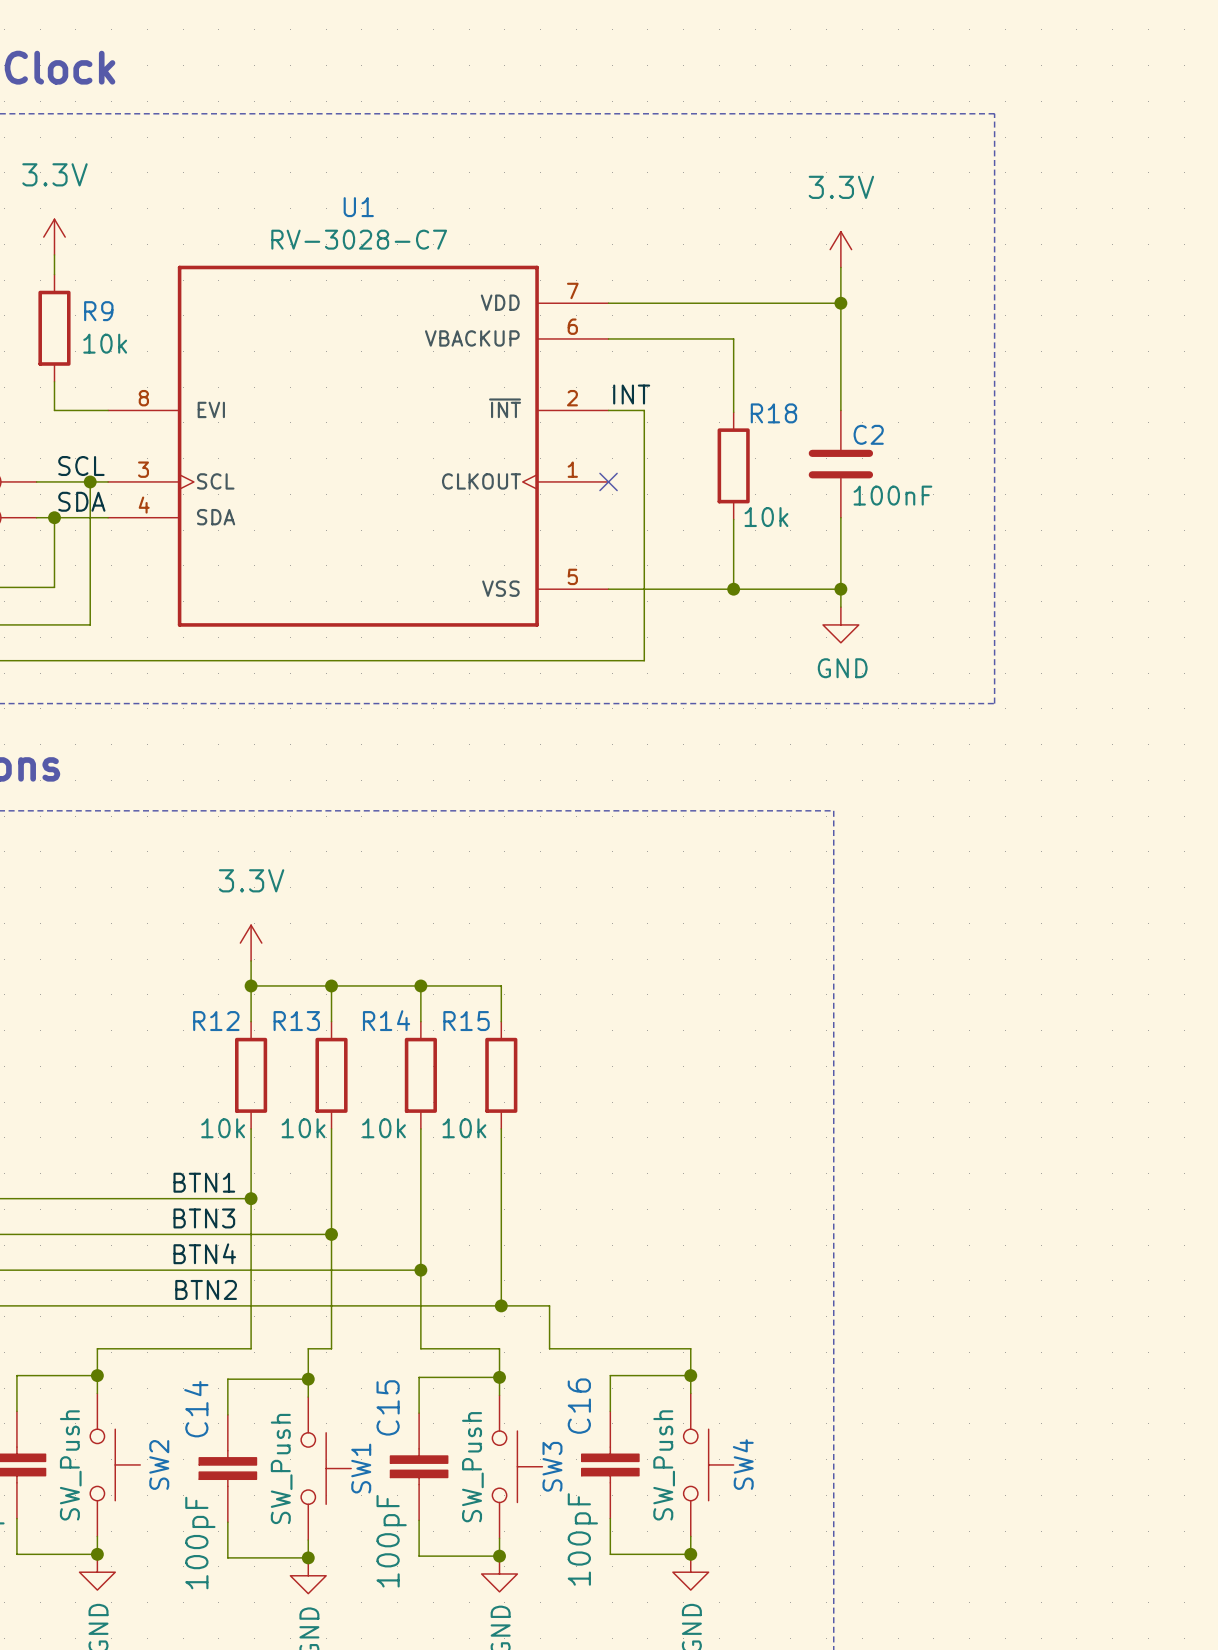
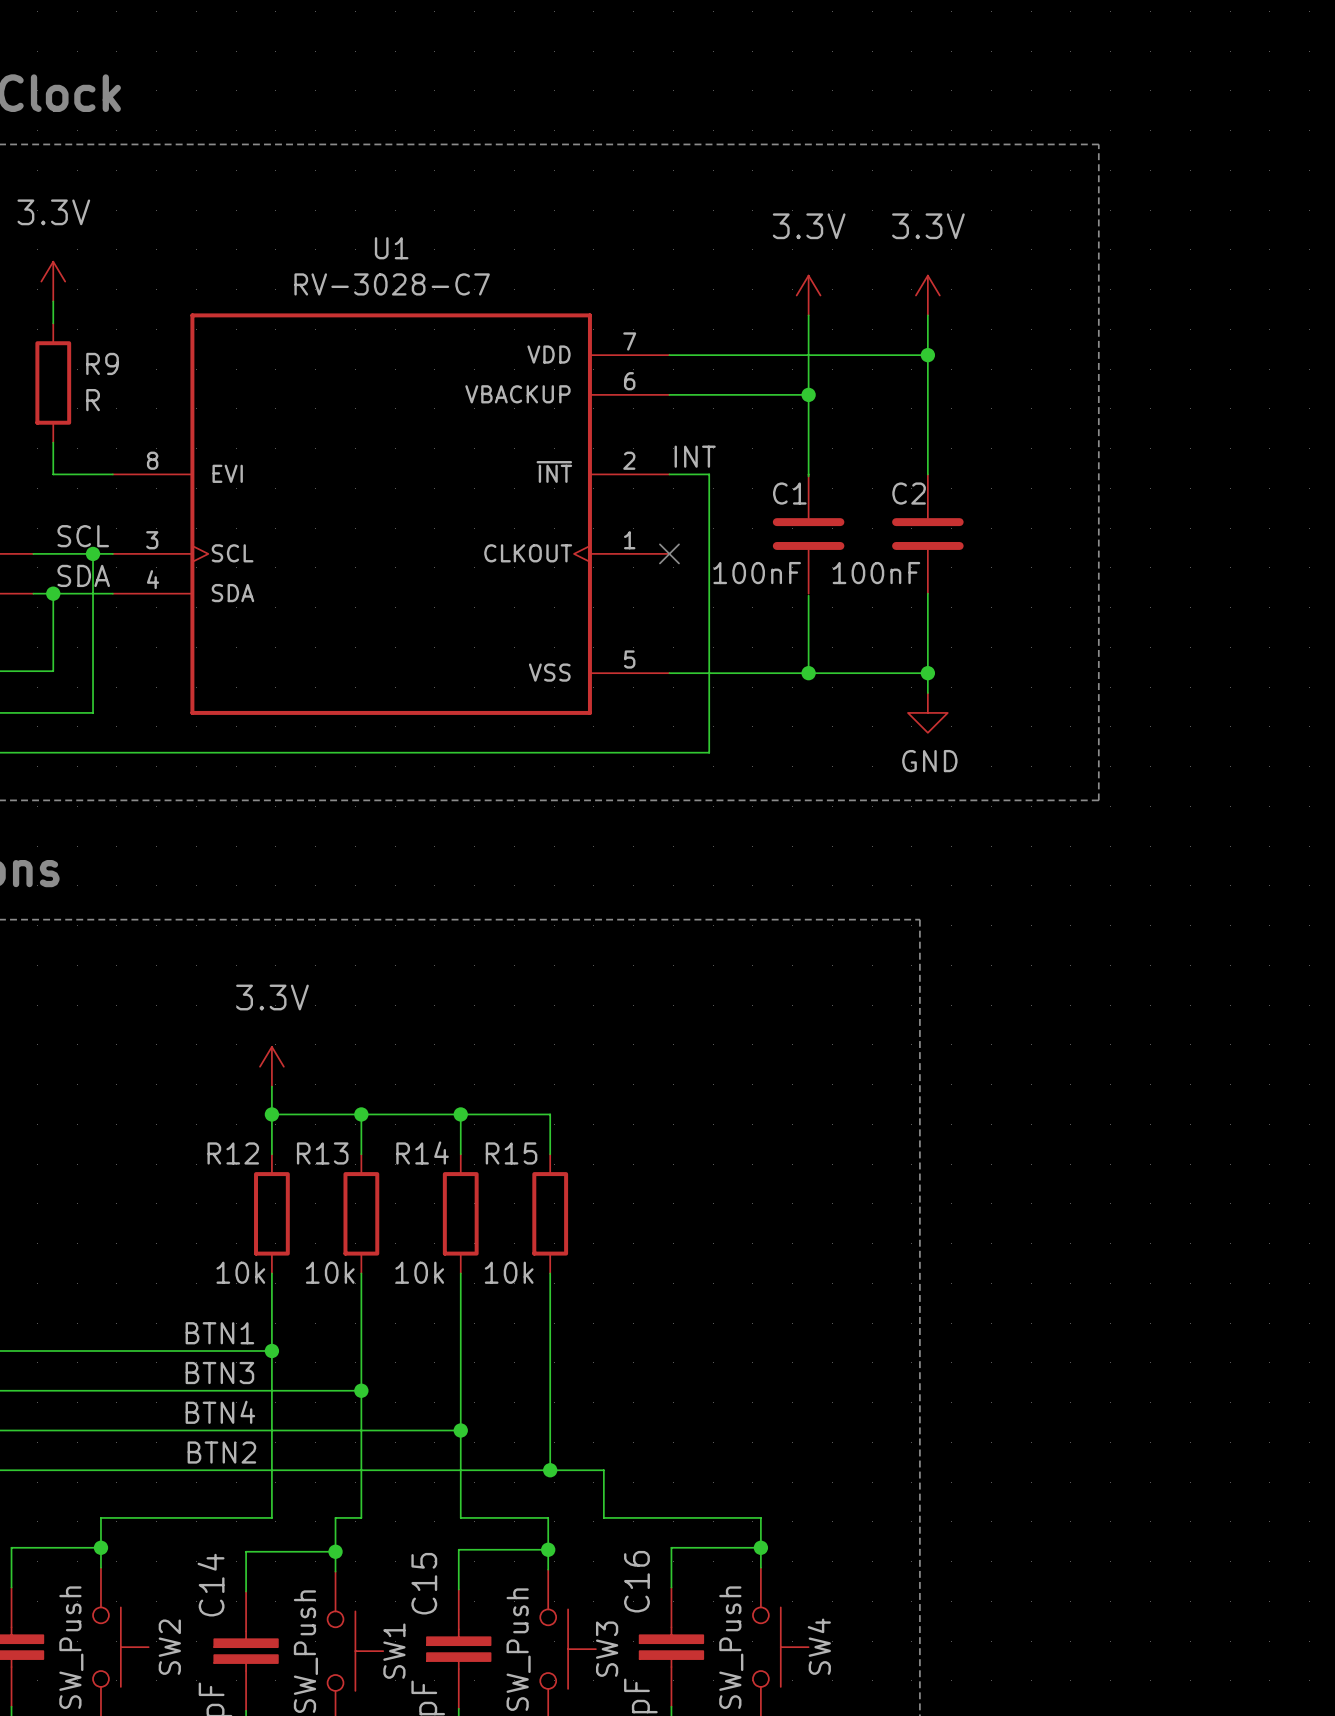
power symbol: none -> 3.3V (808, 295)
wire: none -> (808, 315) (808, 394)
junction: none -> (808, 394)
R9 value: 10k (105, 343) -> R (93, 400)
C2 name position: C2 (868, 434) -> C2 (909, 493)
C1: none -> 100nF (808, 534)
R18: 10k (733, 465) -> none
C2 value position: 100nF (892, 495) -> 100nF (876, 573)

